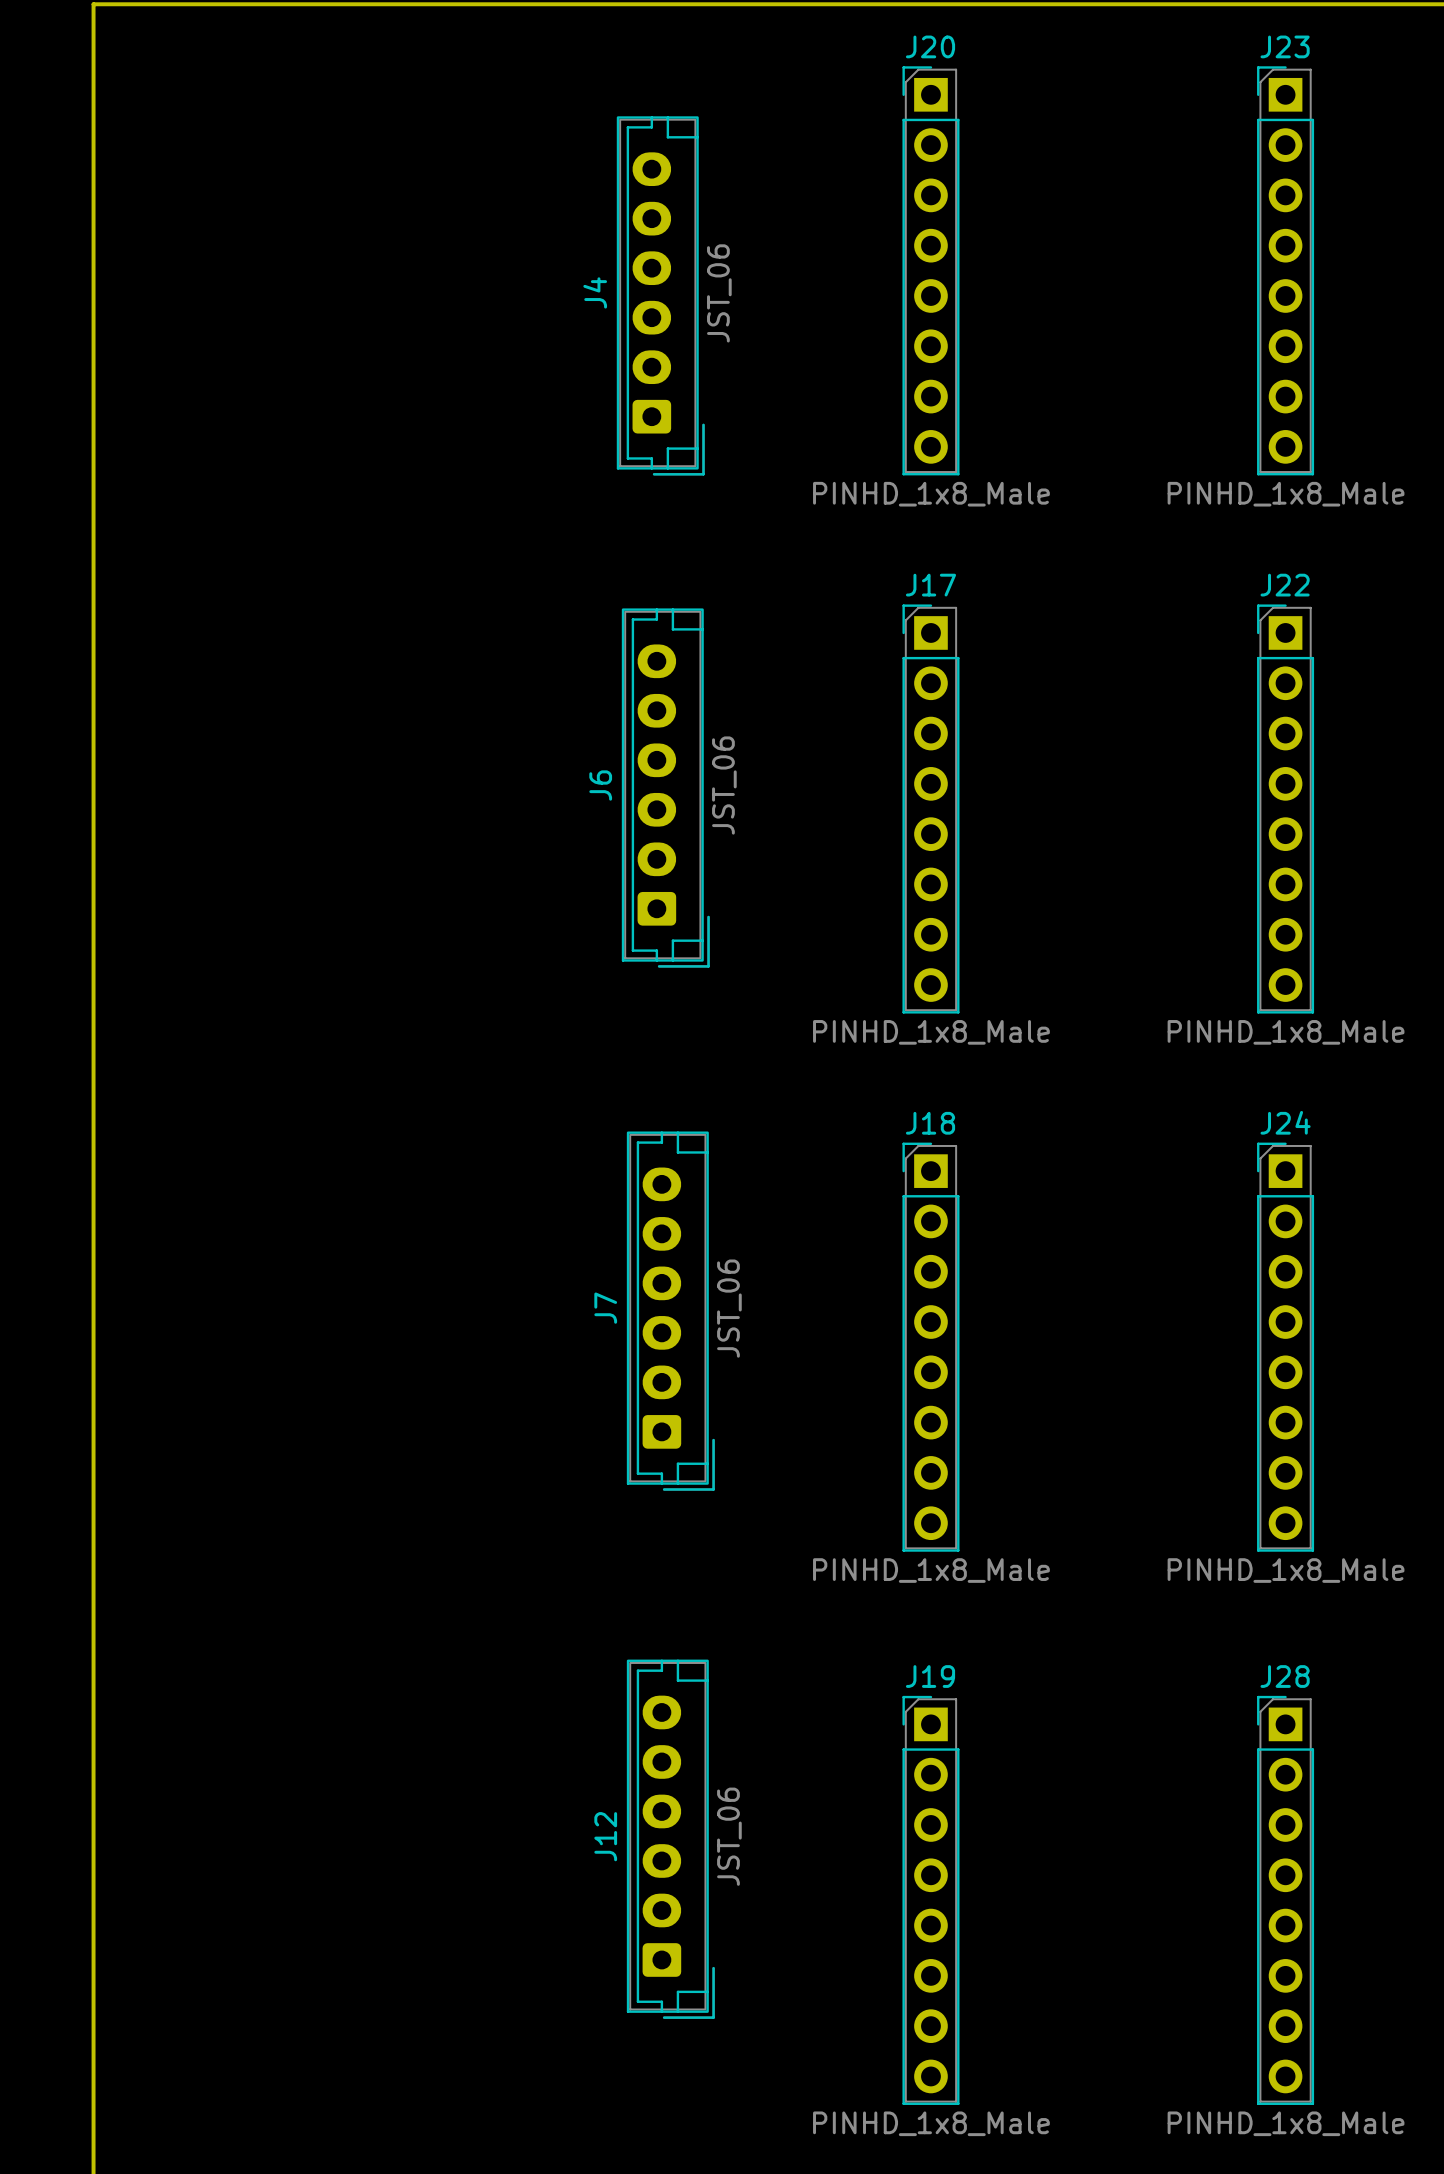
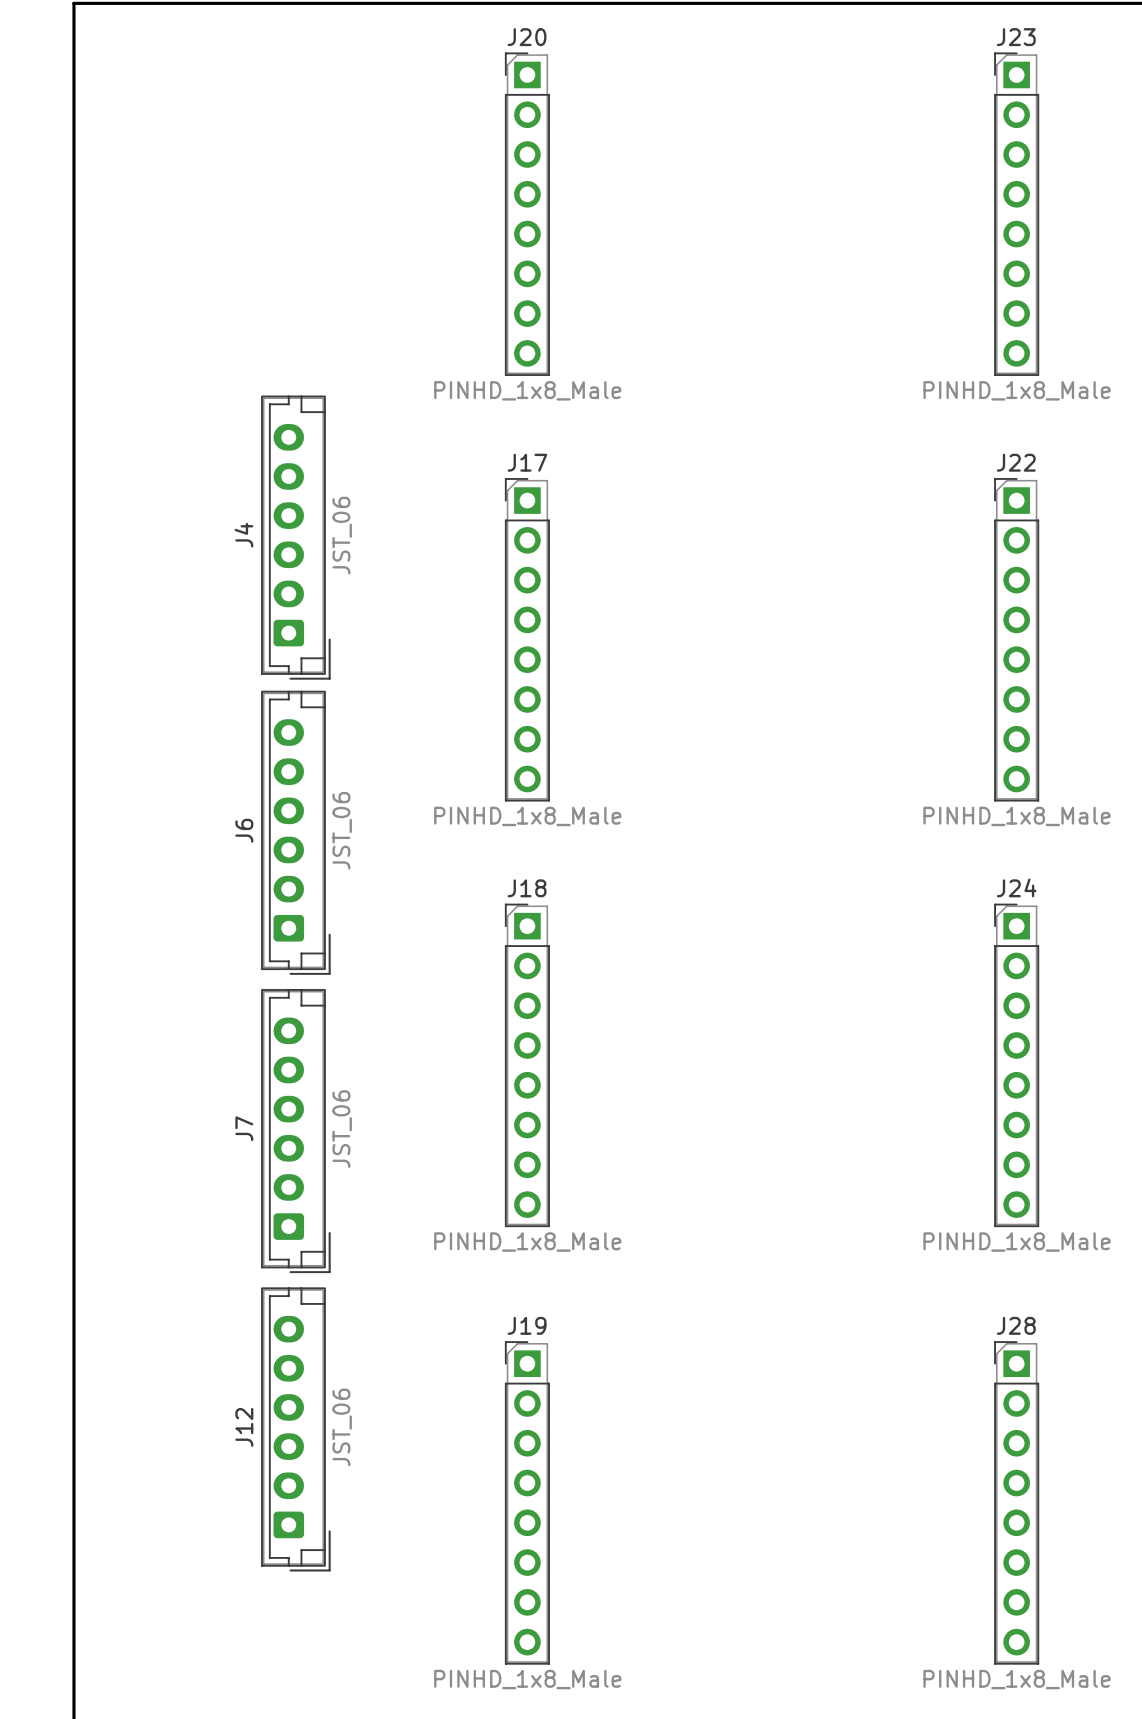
J20 position: (930, 270) -> (527, 214)
J4 position: (660, 295) -> (295, 537)
J6 position: (665, 788) -> (295, 832)
J17 position: (930, 809) -> (527, 639)
J7 position: (670, 1311) -> (295, 1131)
J18 position: (930, 1347) -> (527, 1065)
J12 position: (670, 1839) -> (295, 1429)
J19 position: (930, 1900) -> (527, 1502)

